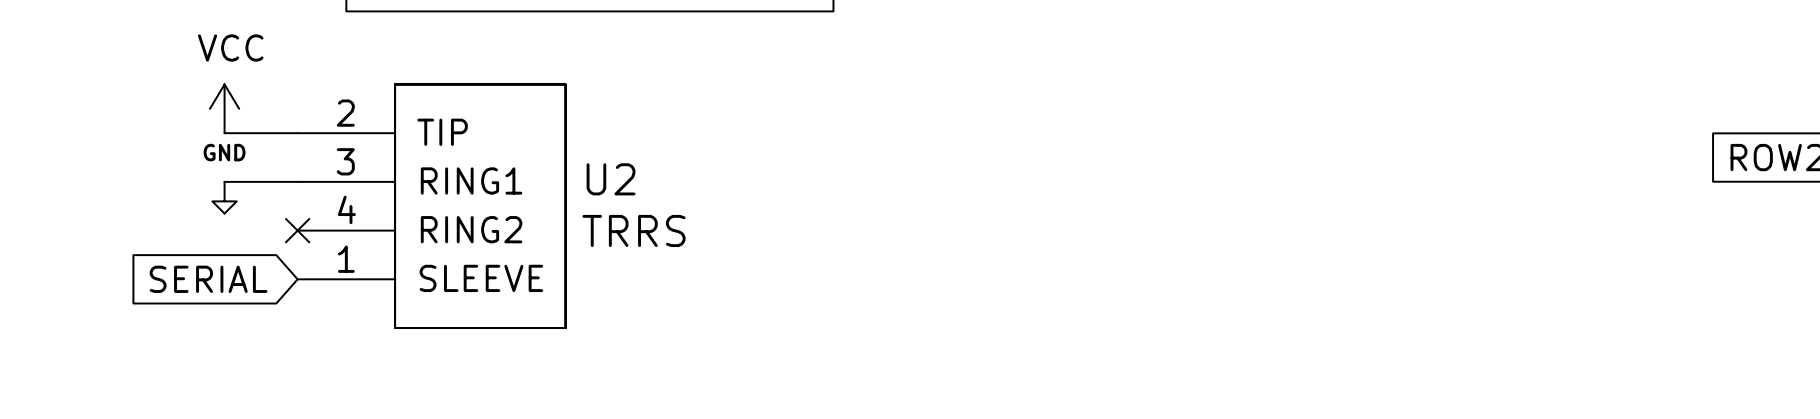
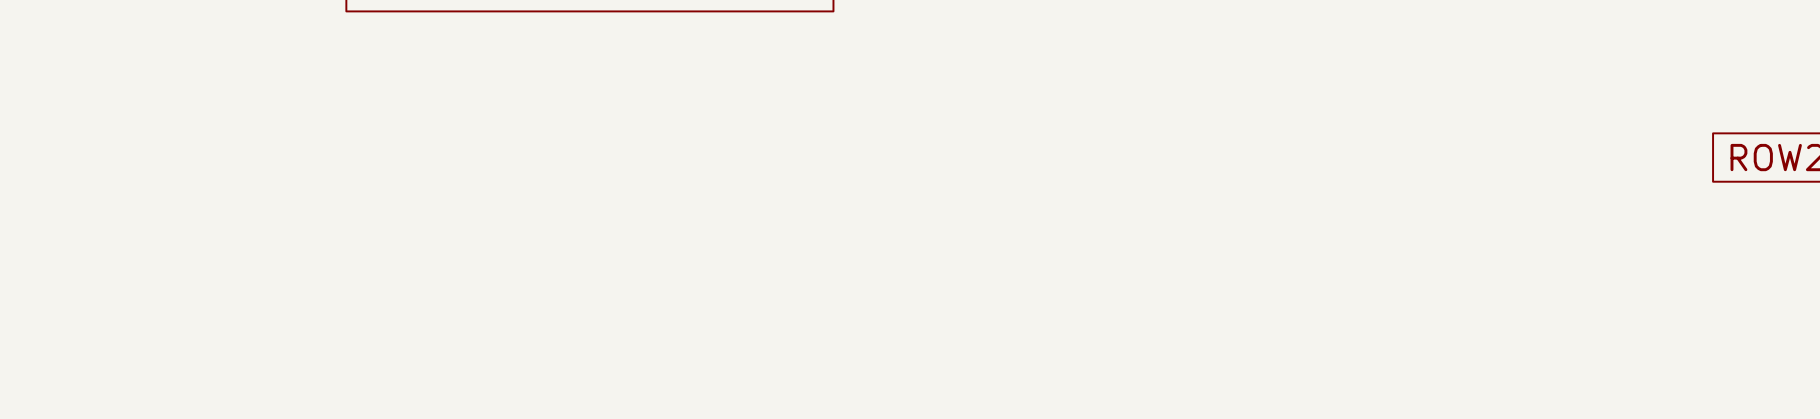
power symbol: VCC (224, 108) -> none
wire: (224, 133) (297, 133) -> none
wire: (224, 181) (297, 181) -> none
power symbol: GND (224, 197) -> none
U2: TRRS (431, 206) -> none
no-connect mark: (297, 230) -> none
global label: SERIAL (208, 279) -> none

